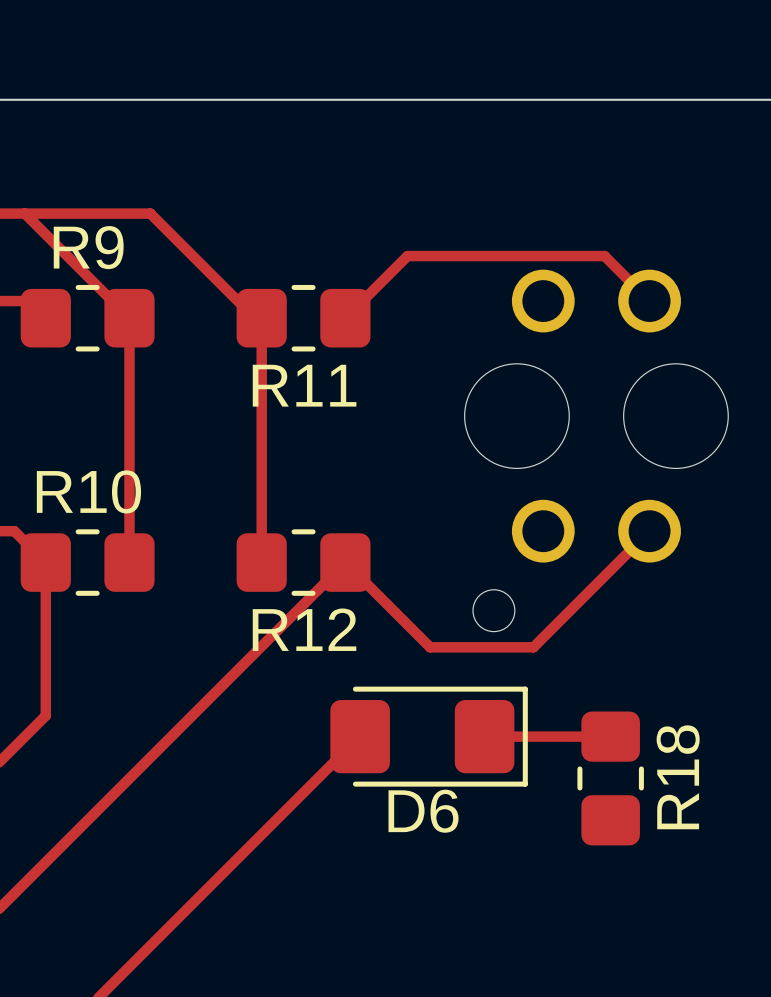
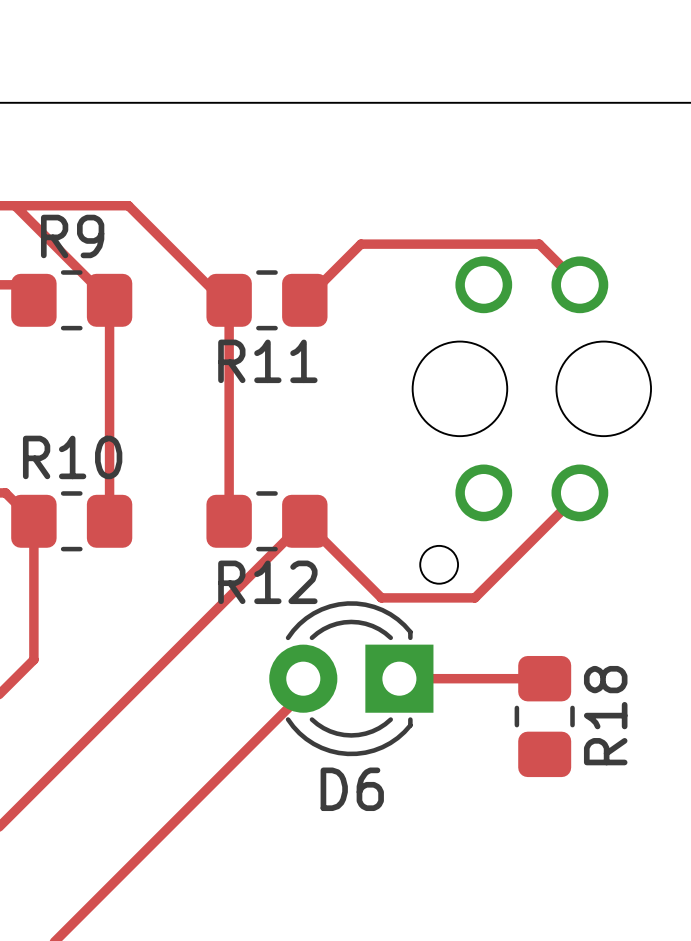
D6 footprint: [330, 686, 528, 787] -> [269, 601, 434, 757]

